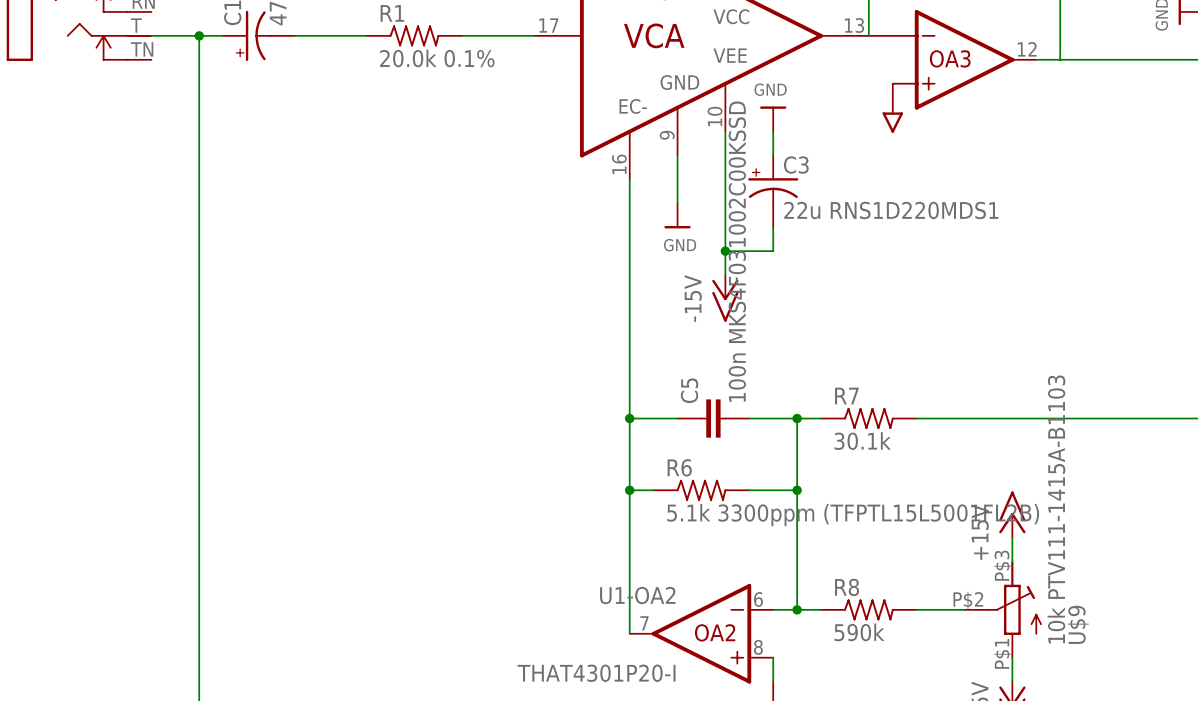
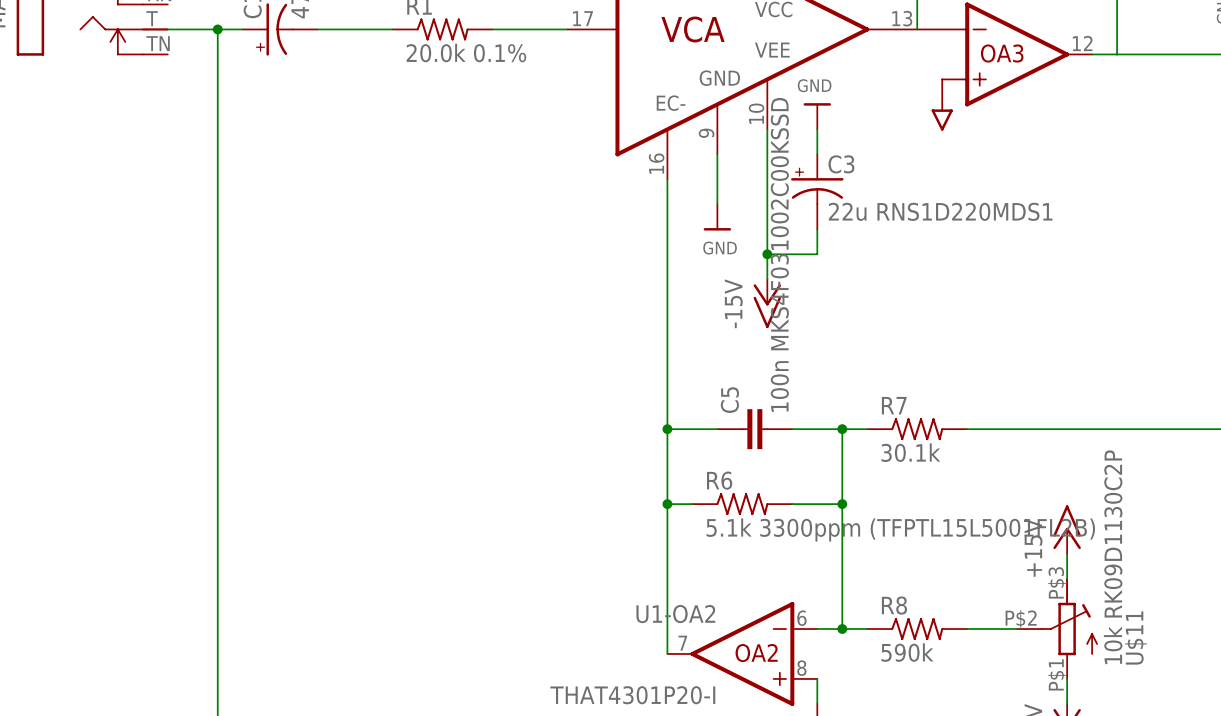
U$9 value: 10k PTV111-1415A-B1103 (1056, 509) -> 10k RK09D1130C2P (1113, 557)
U$9 name: U$9 (1078, 624) -> U$11 (1135, 638)

